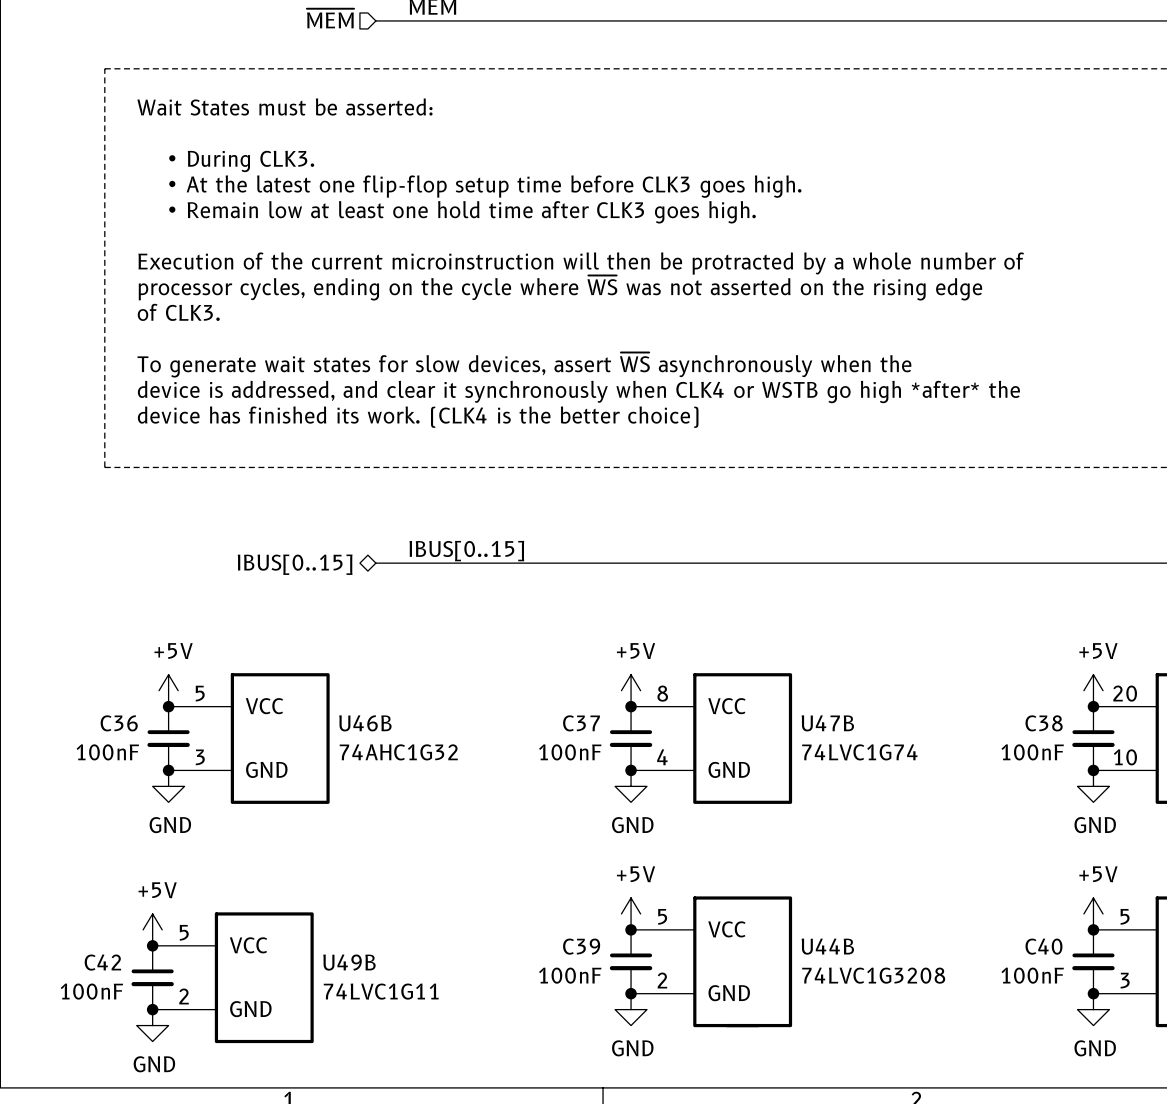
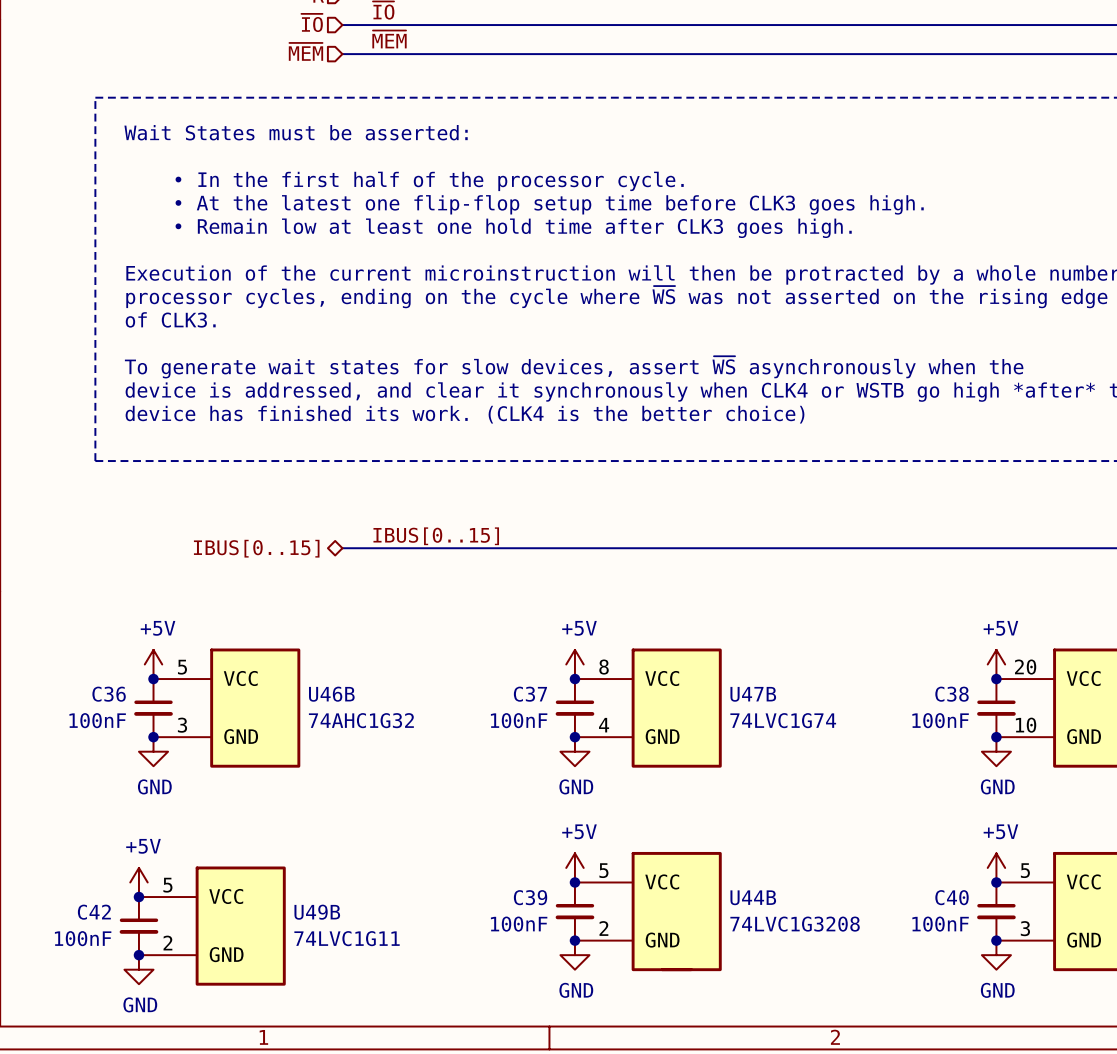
text: • During CLK3. (241, 161) -> • In the first half of the processor cycle. (429, 181)

